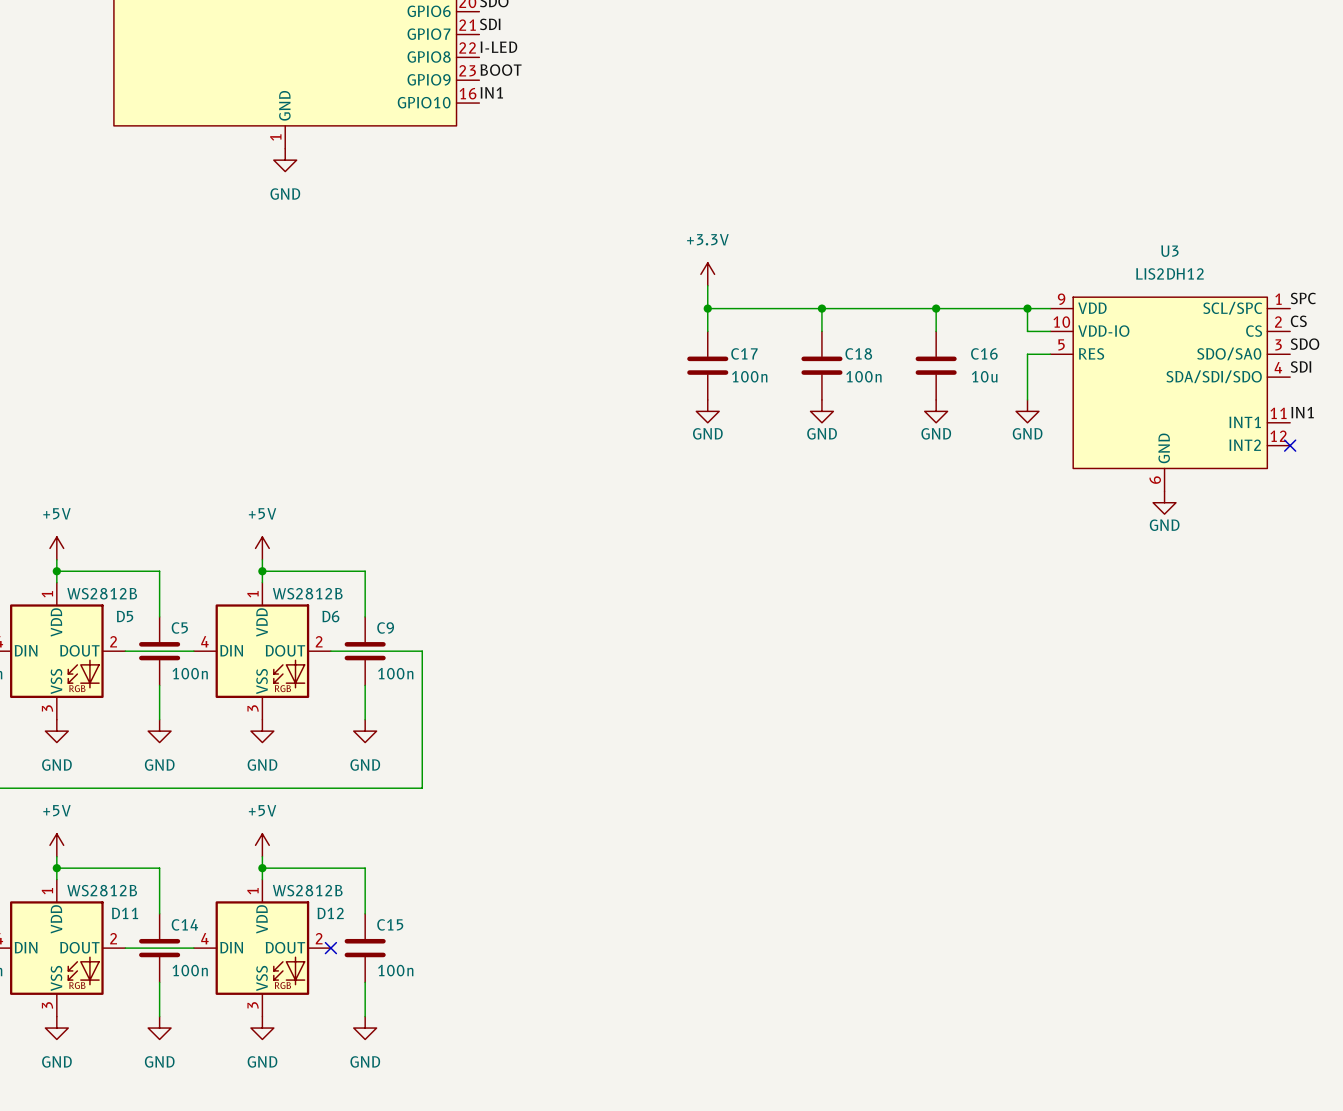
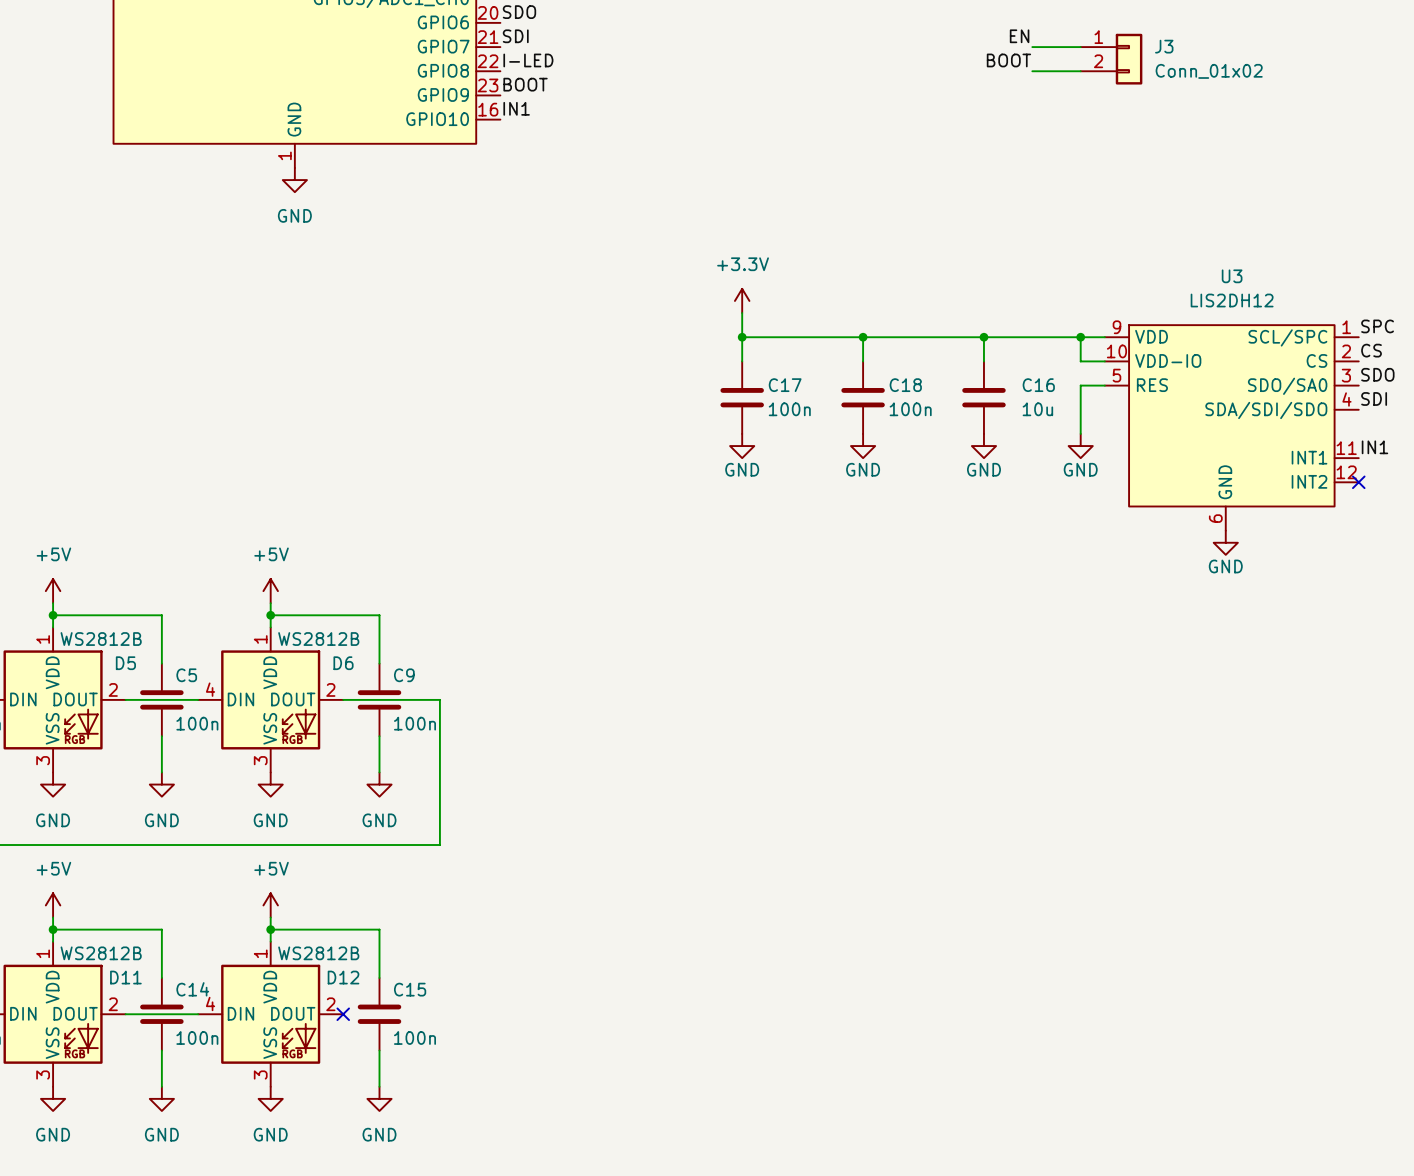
label: none -> EN (1019, 36)
wire: none -> (1032, 47) (1080, 47)
J3: none -> Conn_01x02 (1111, 59)
label: none -> BOOT (1008, 60)
wire: none -> (1032, 71) (1080, 71)

